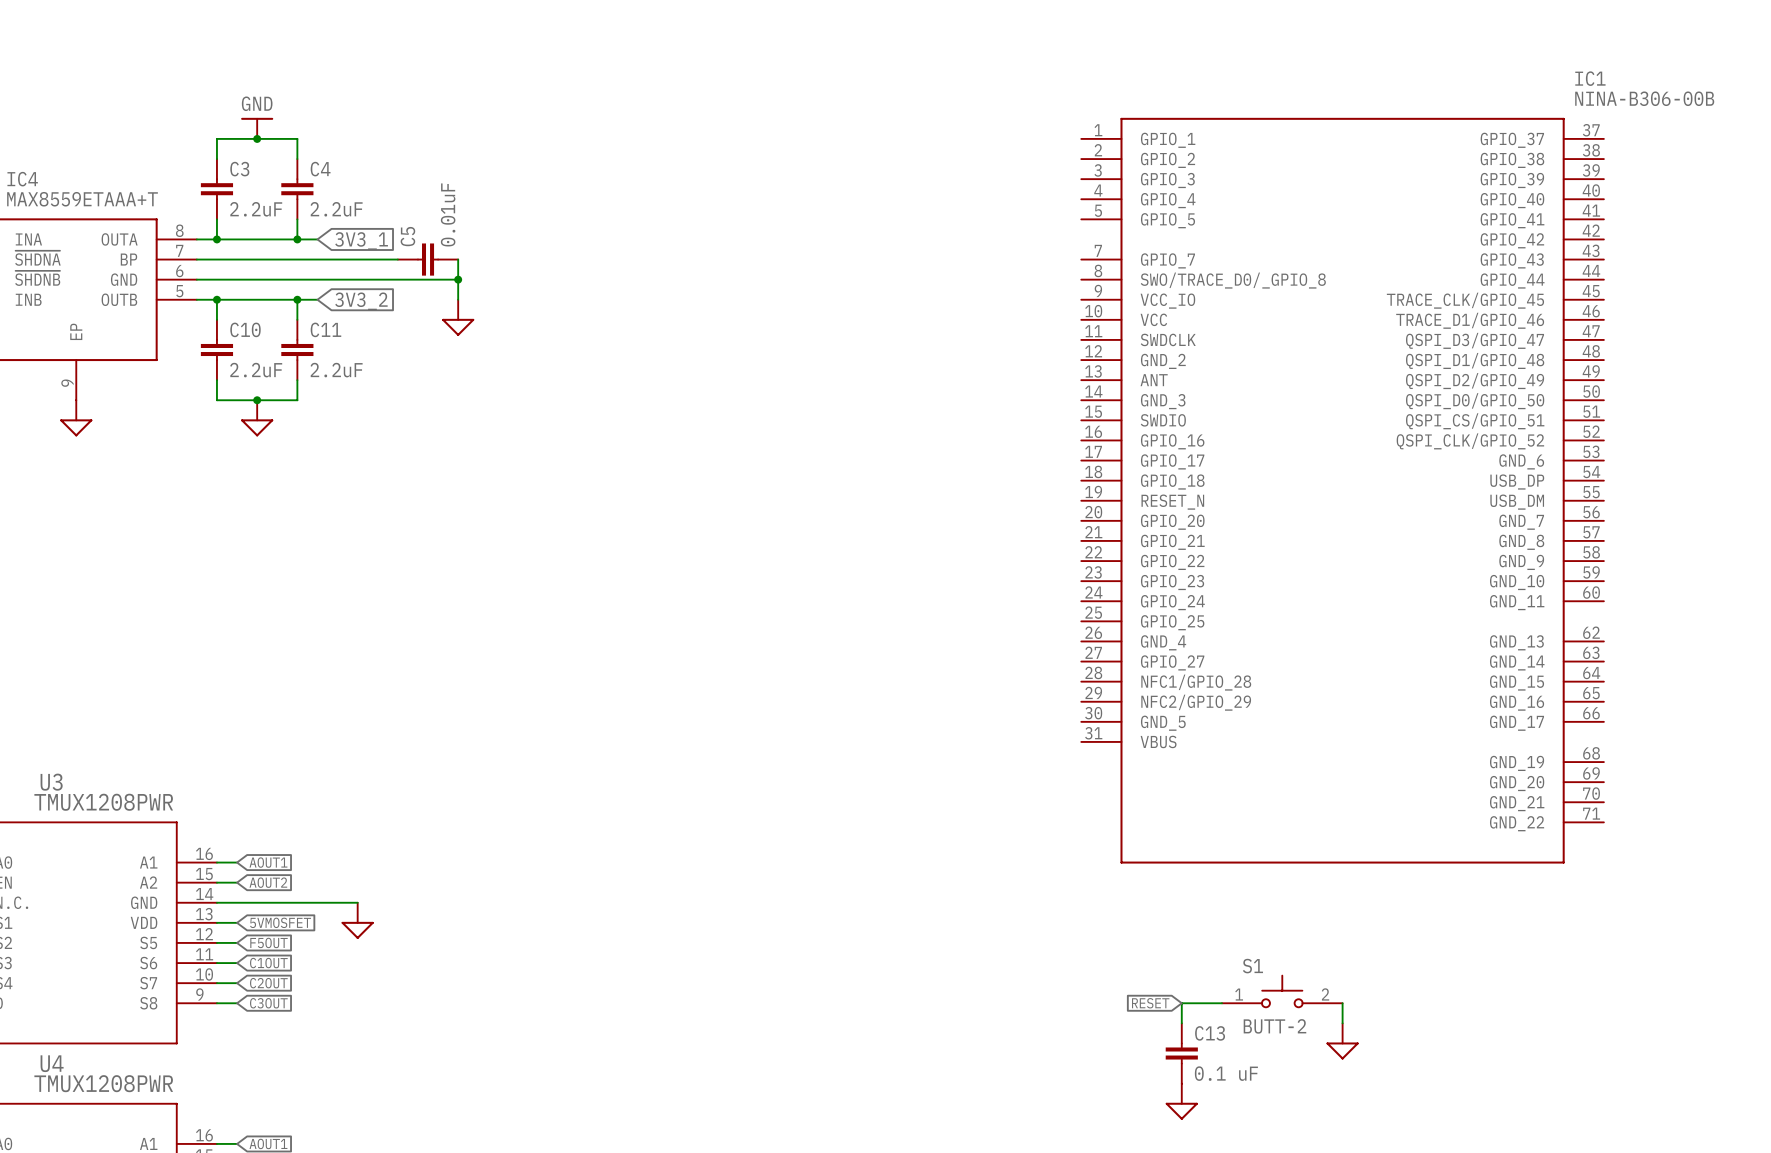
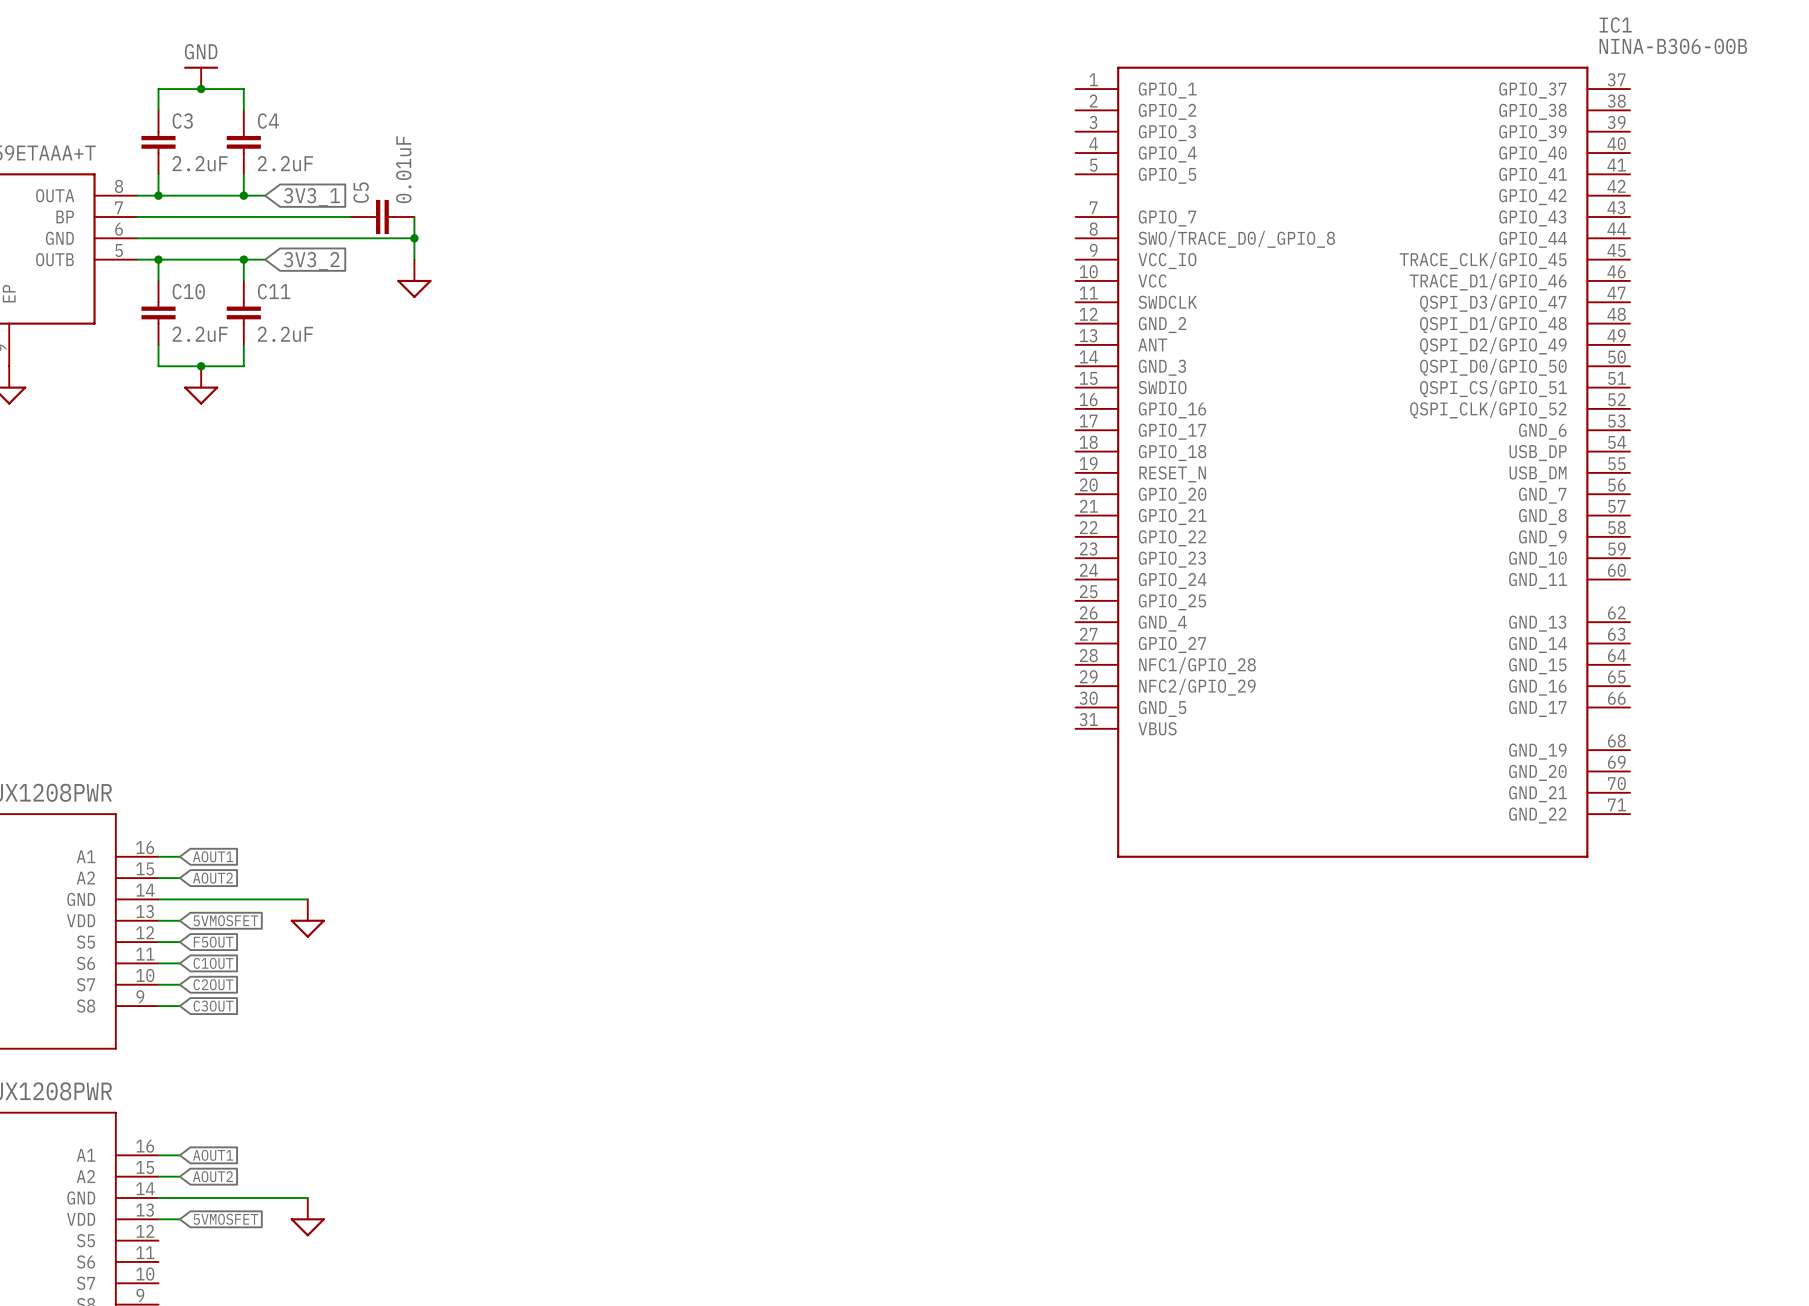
S1: BUTT-2 (1282, 991) -> none
global label: RESET (1150, 1003) -> none
wire: (1221, 1003) (1181, 1003) (1181, 1023) -> none
wire: (1342, 1003) (1342, 1023) -> none
power symbol: (1342, 1041) -> none
C13: 0.1 uF (1181, 1053) -> none
power symbol: (1181, 1101) -> none

